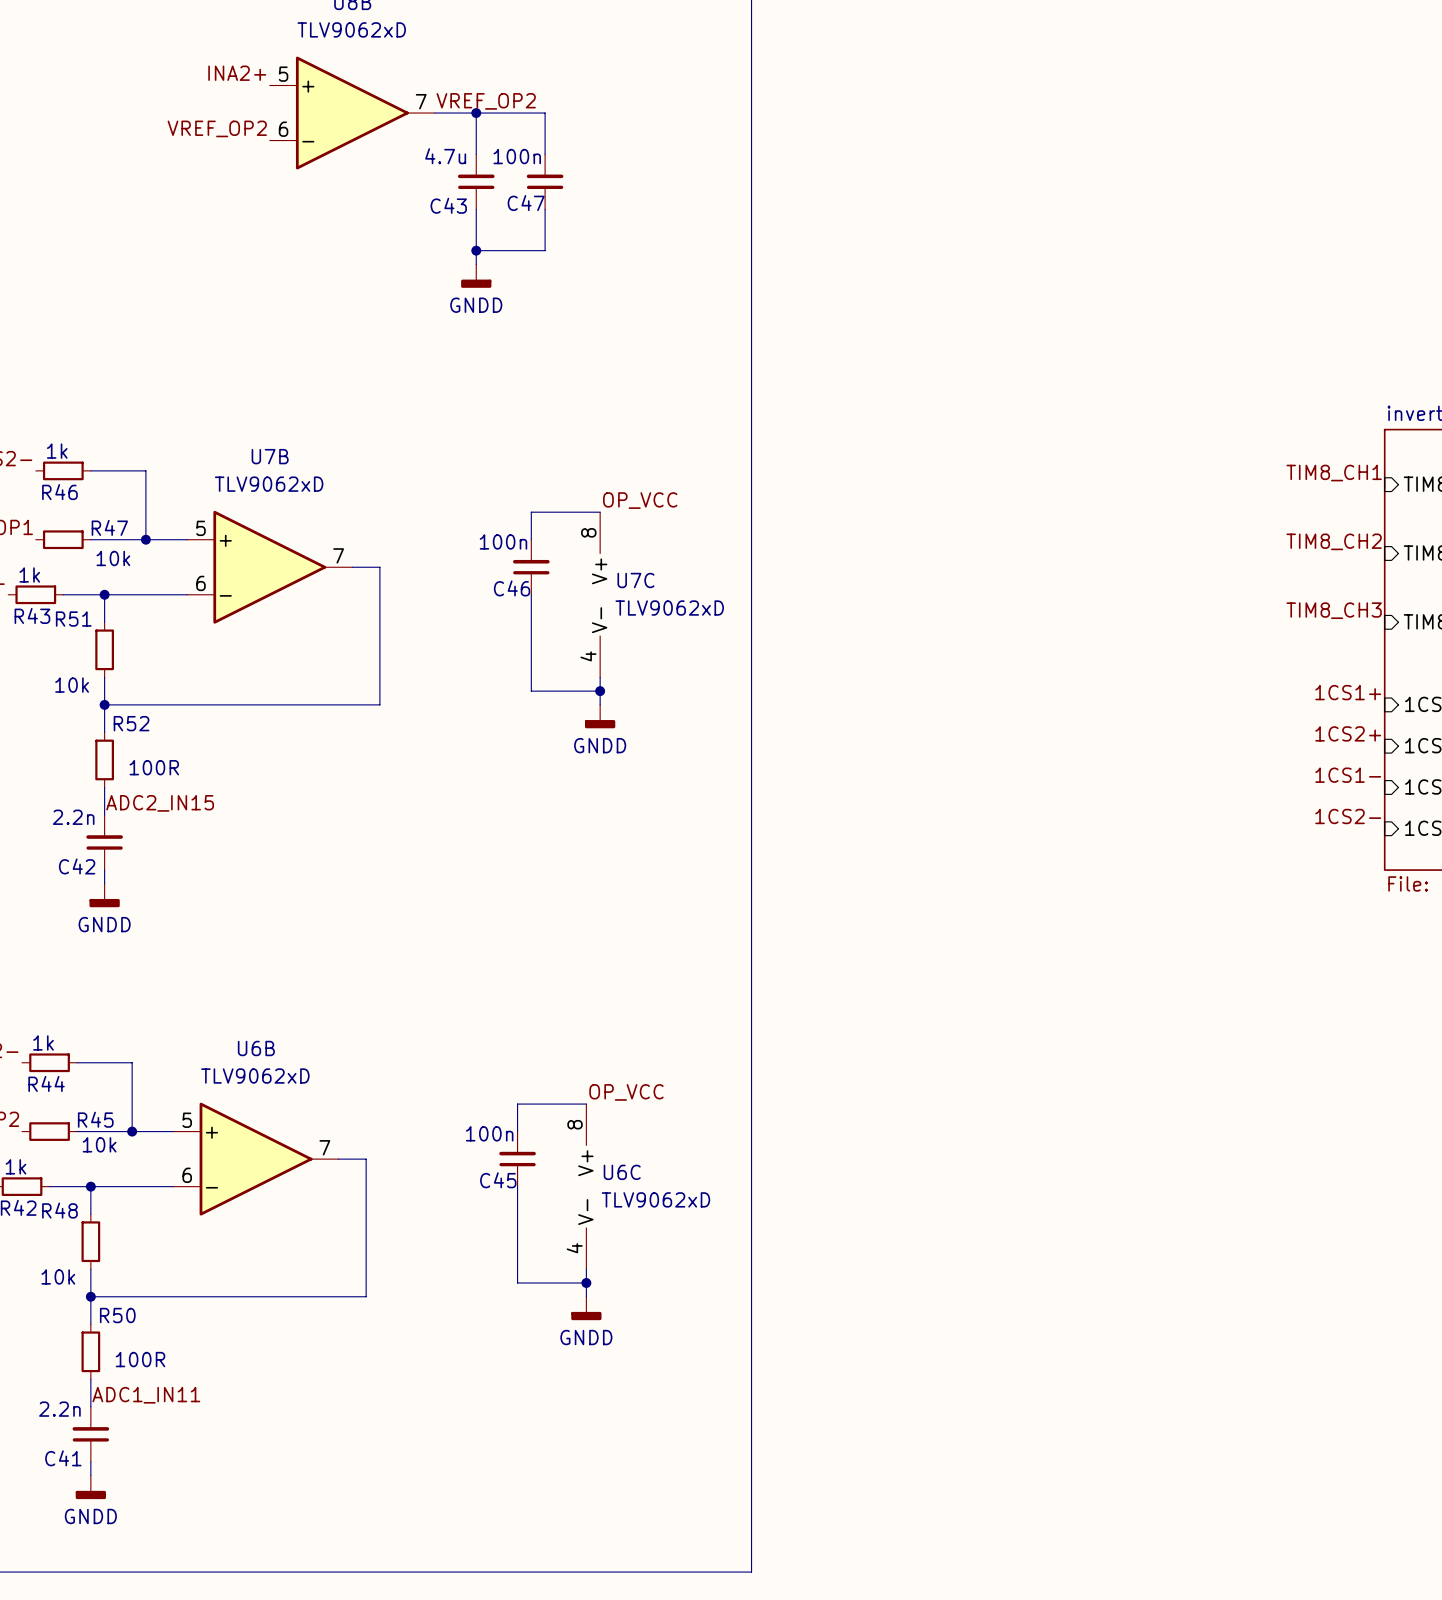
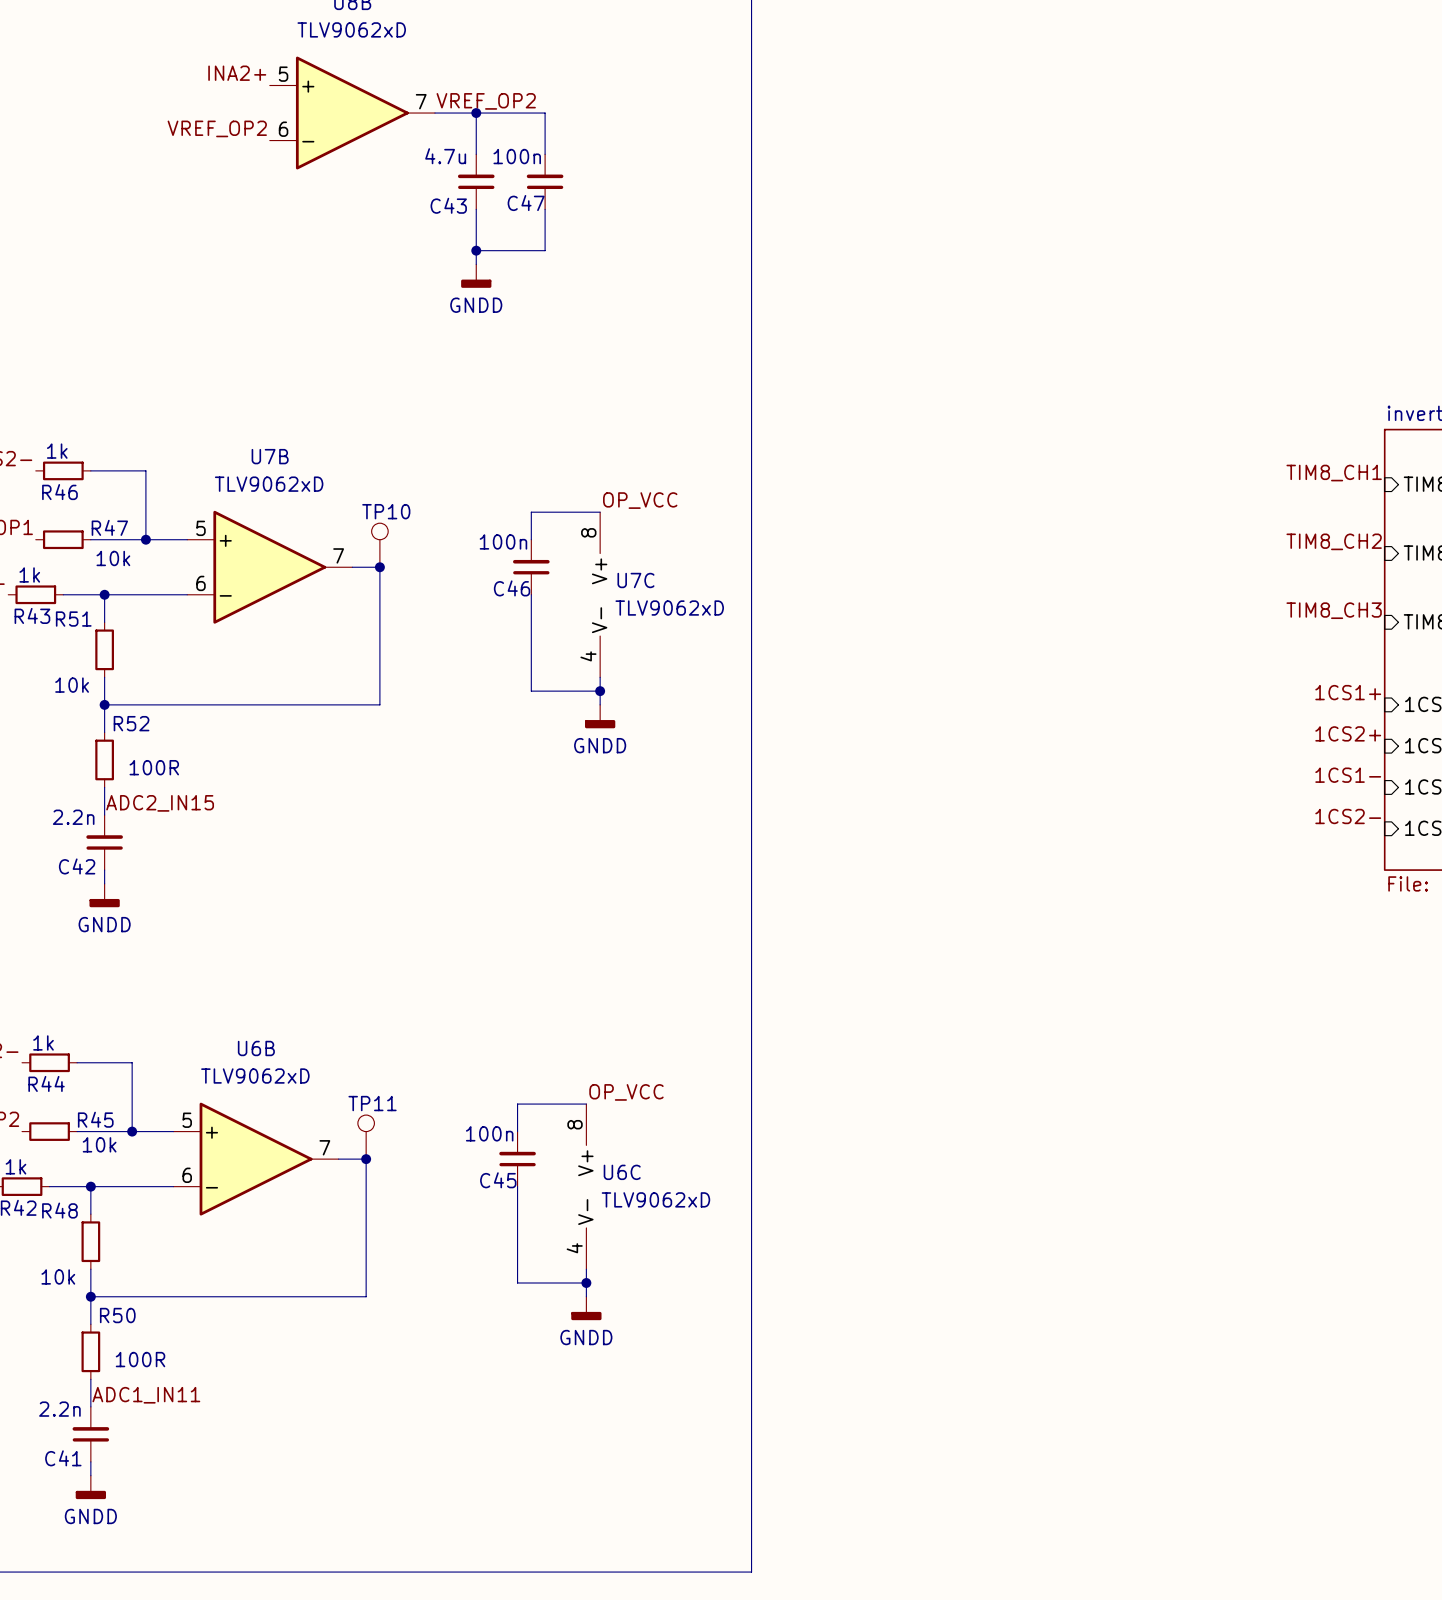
TP10: none -> (379, 545)
junction: none -> (379, 567)
TP11: none -> (366, 1137)
junction: none -> (366, 1159)

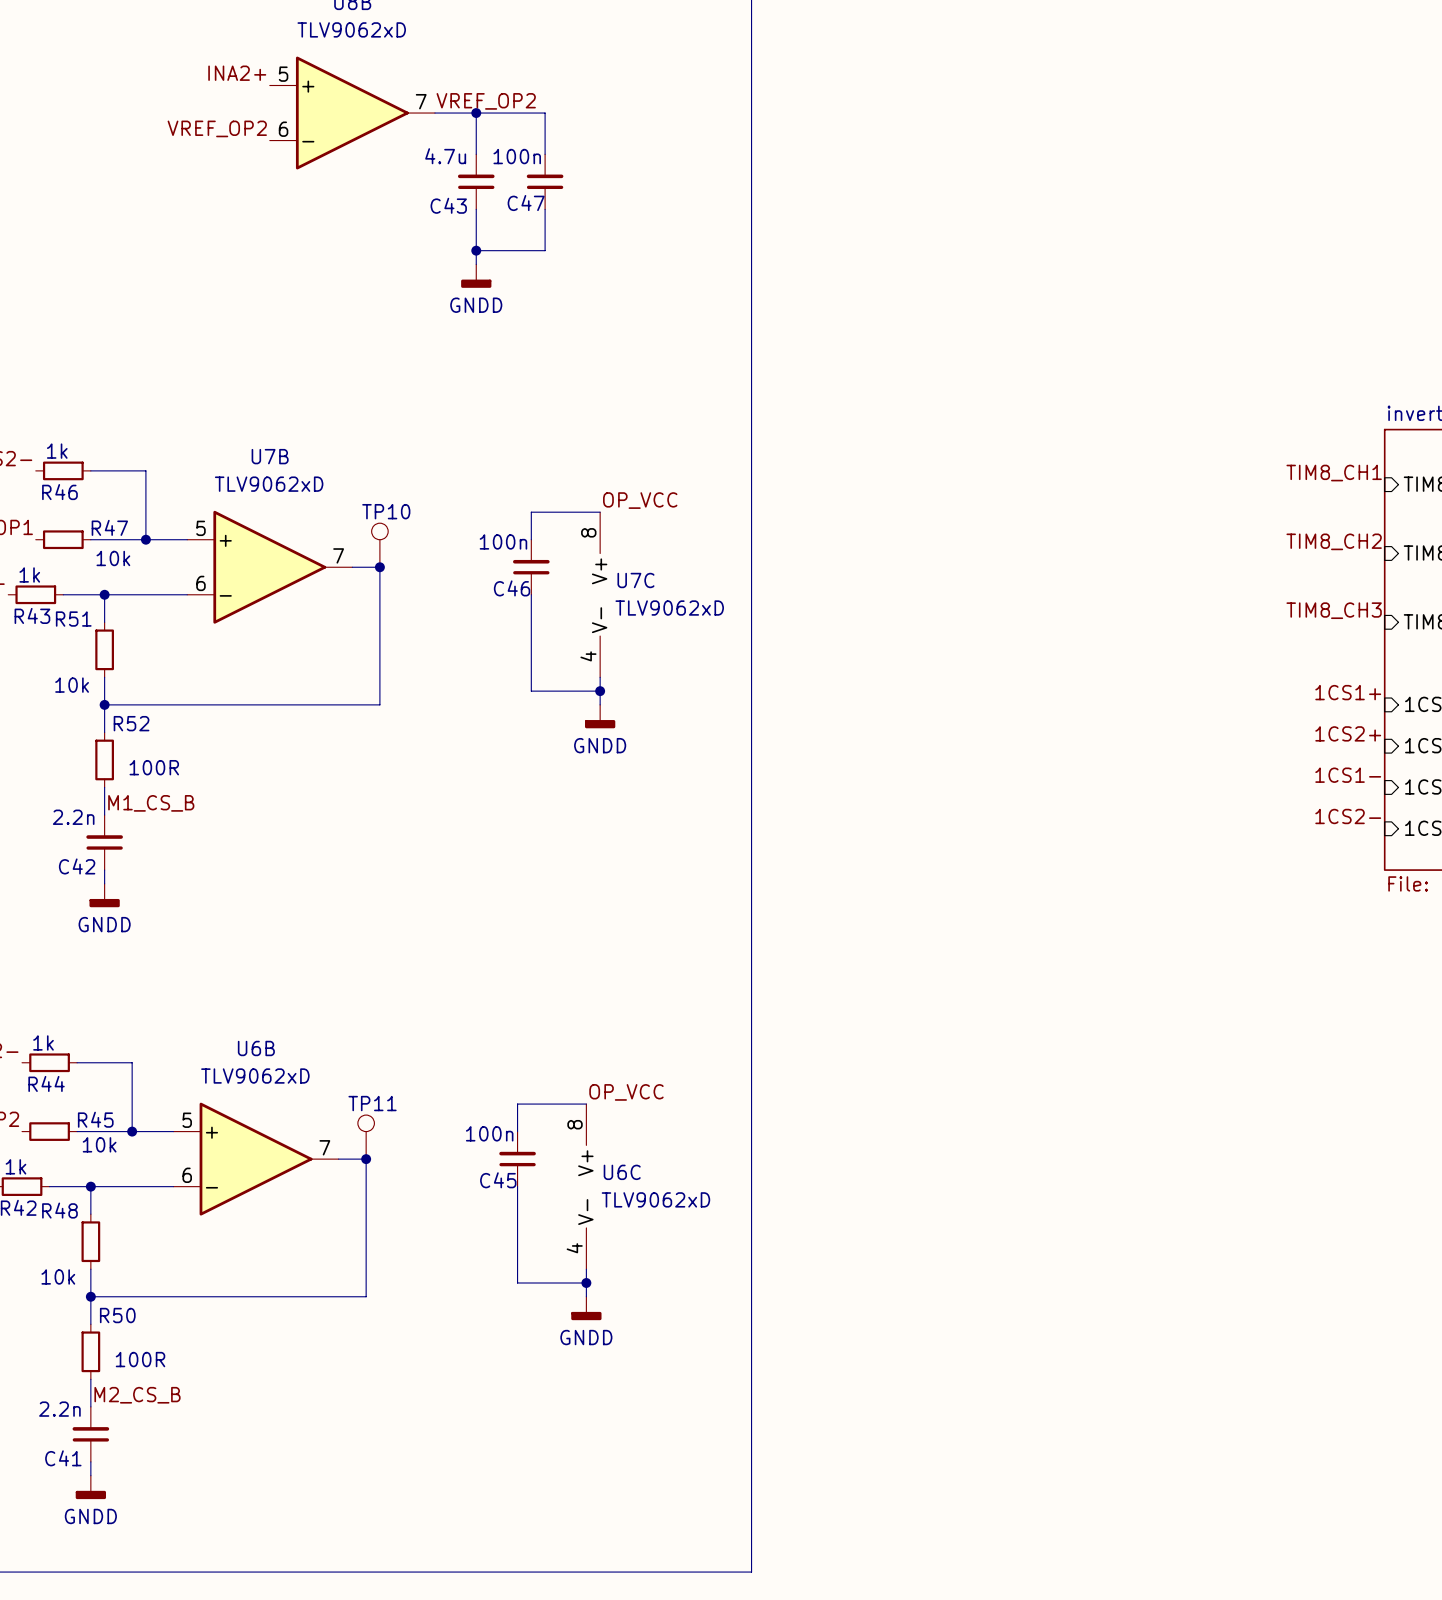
label: ADC2_IN15 (160, 803) -> M1_CS_B (151, 803)
label: ADC1_IN11 (146, 1395) -> M2_CS_B (137, 1395)

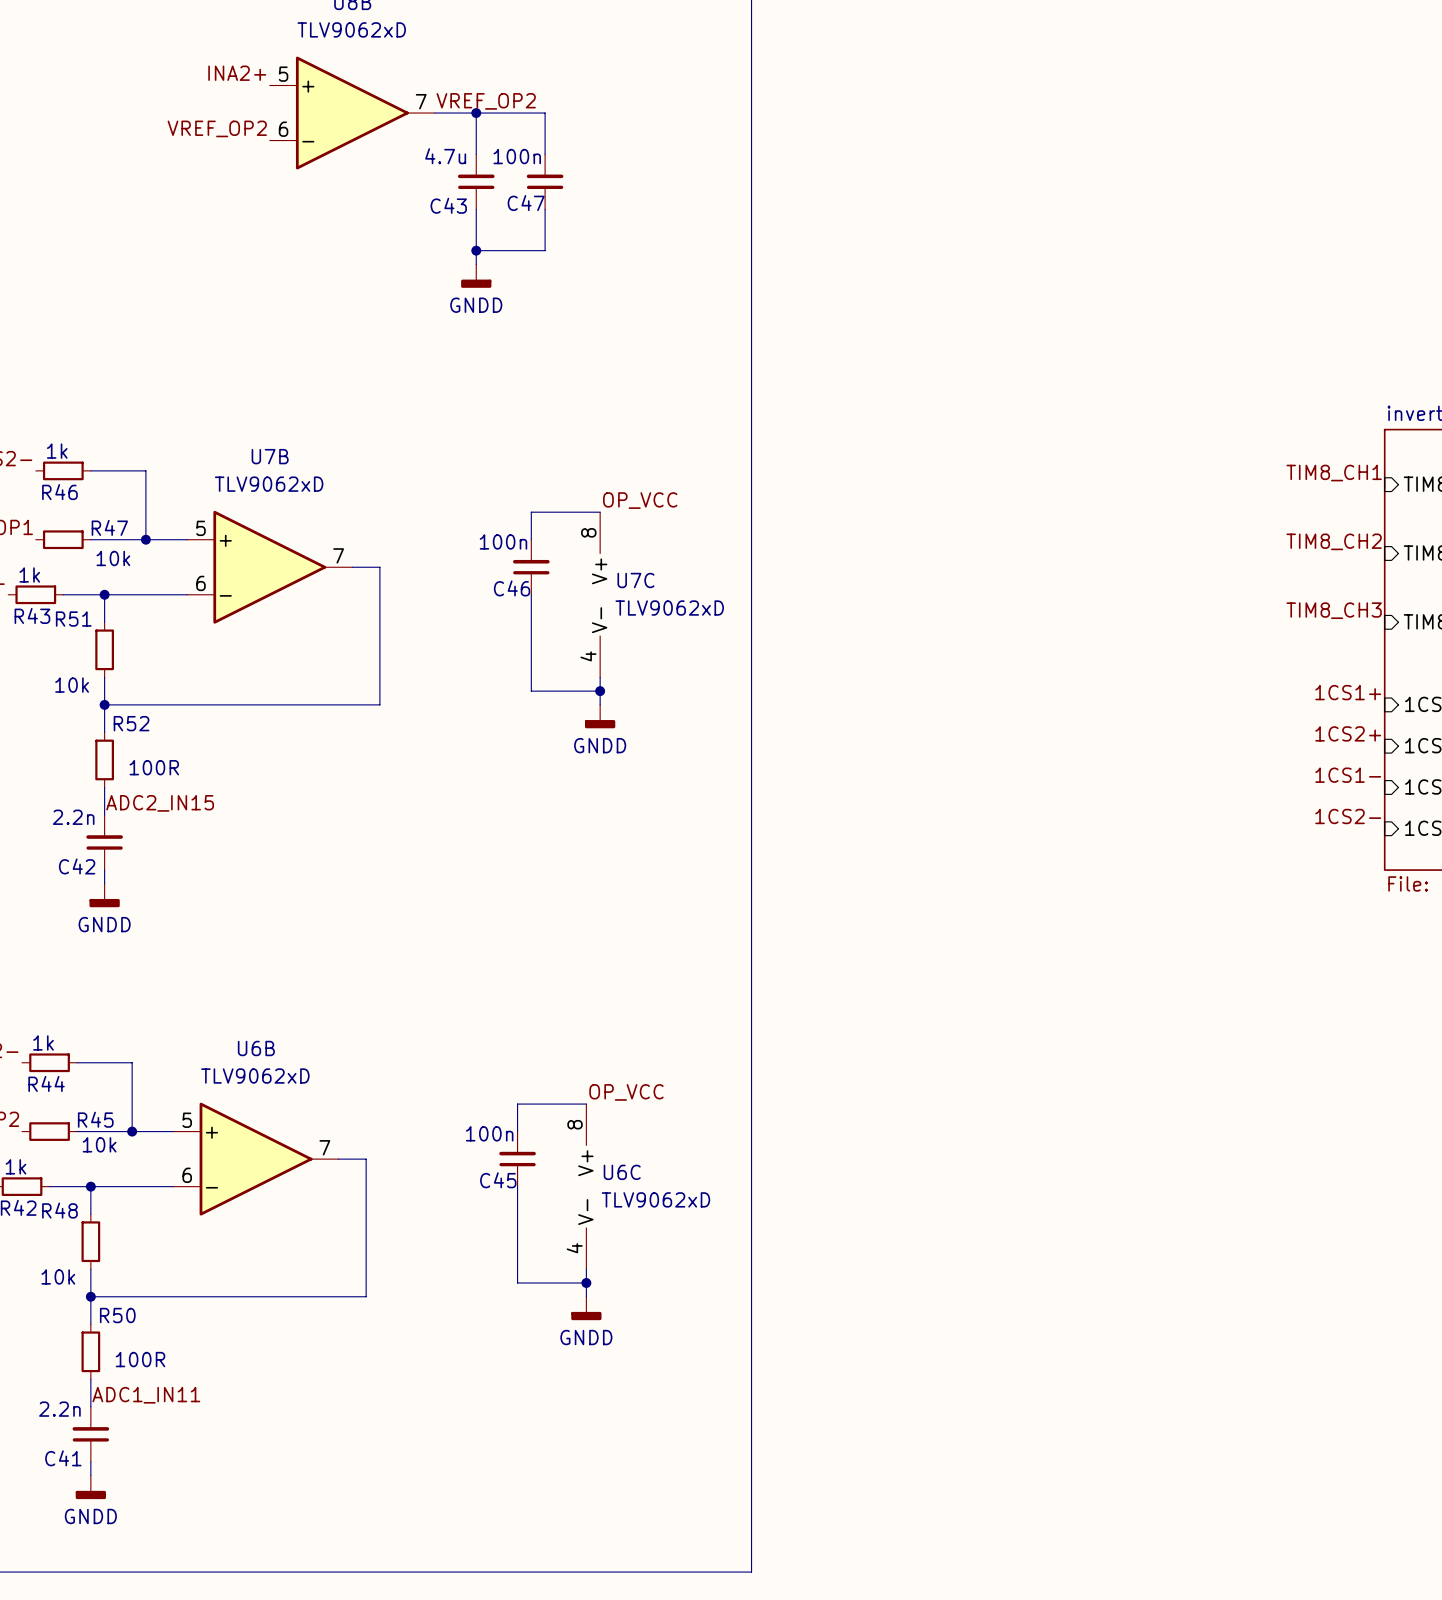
TP10: (379, 545) -> none
junction: (379, 567) -> none
label: M1_CS_B (151, 803) -> ADC2_IN15 (160, 803)
TP11: (366, 1137) -> none
junction: (366, 1159) -> none
label: M2_CS_B (137, 1395) -> ADC1_IN11 (146, 1395)

